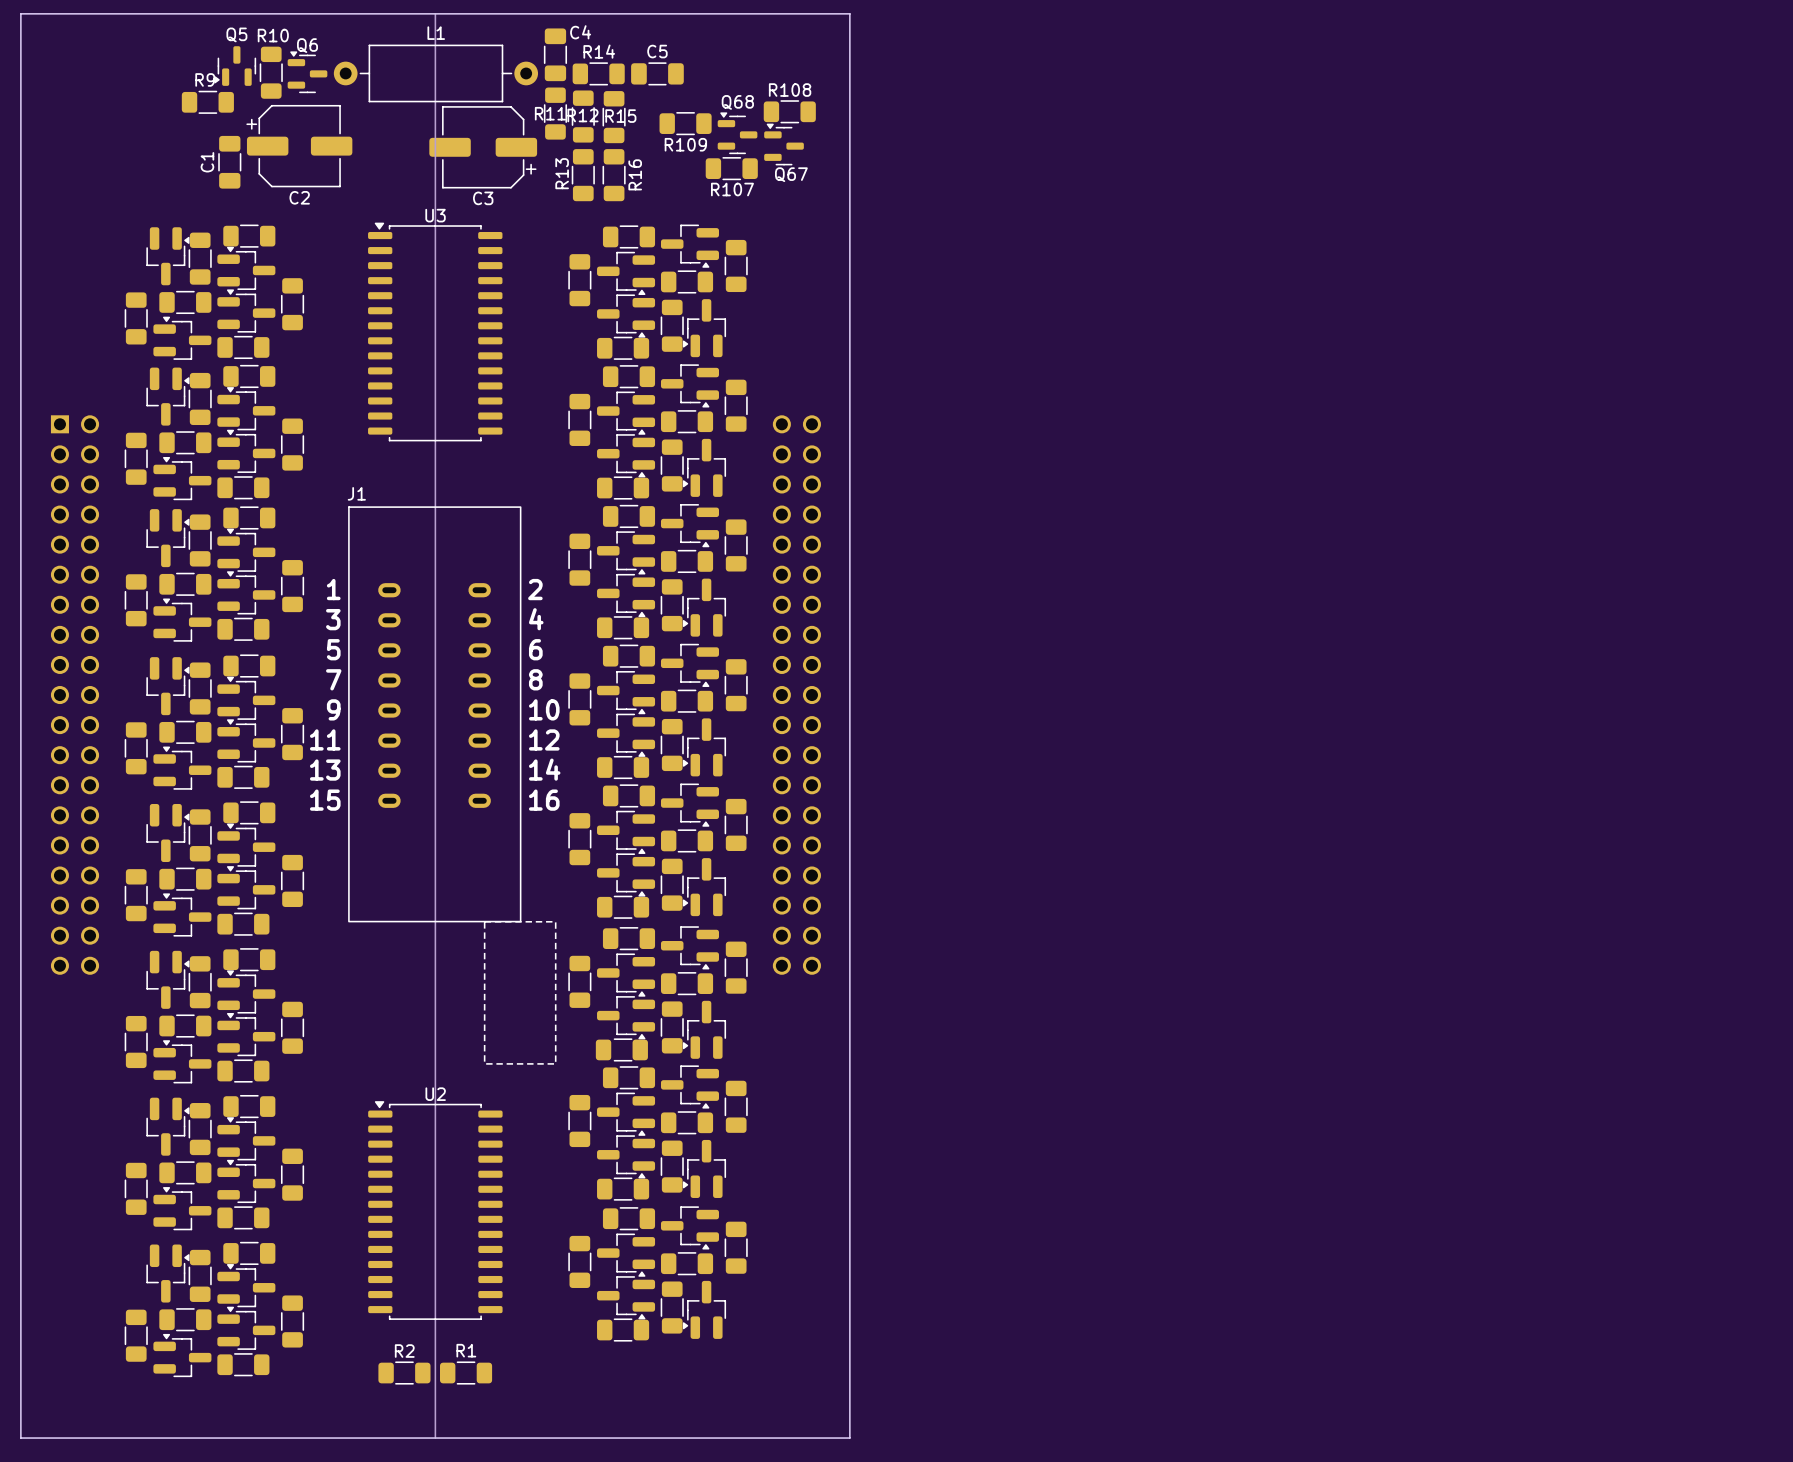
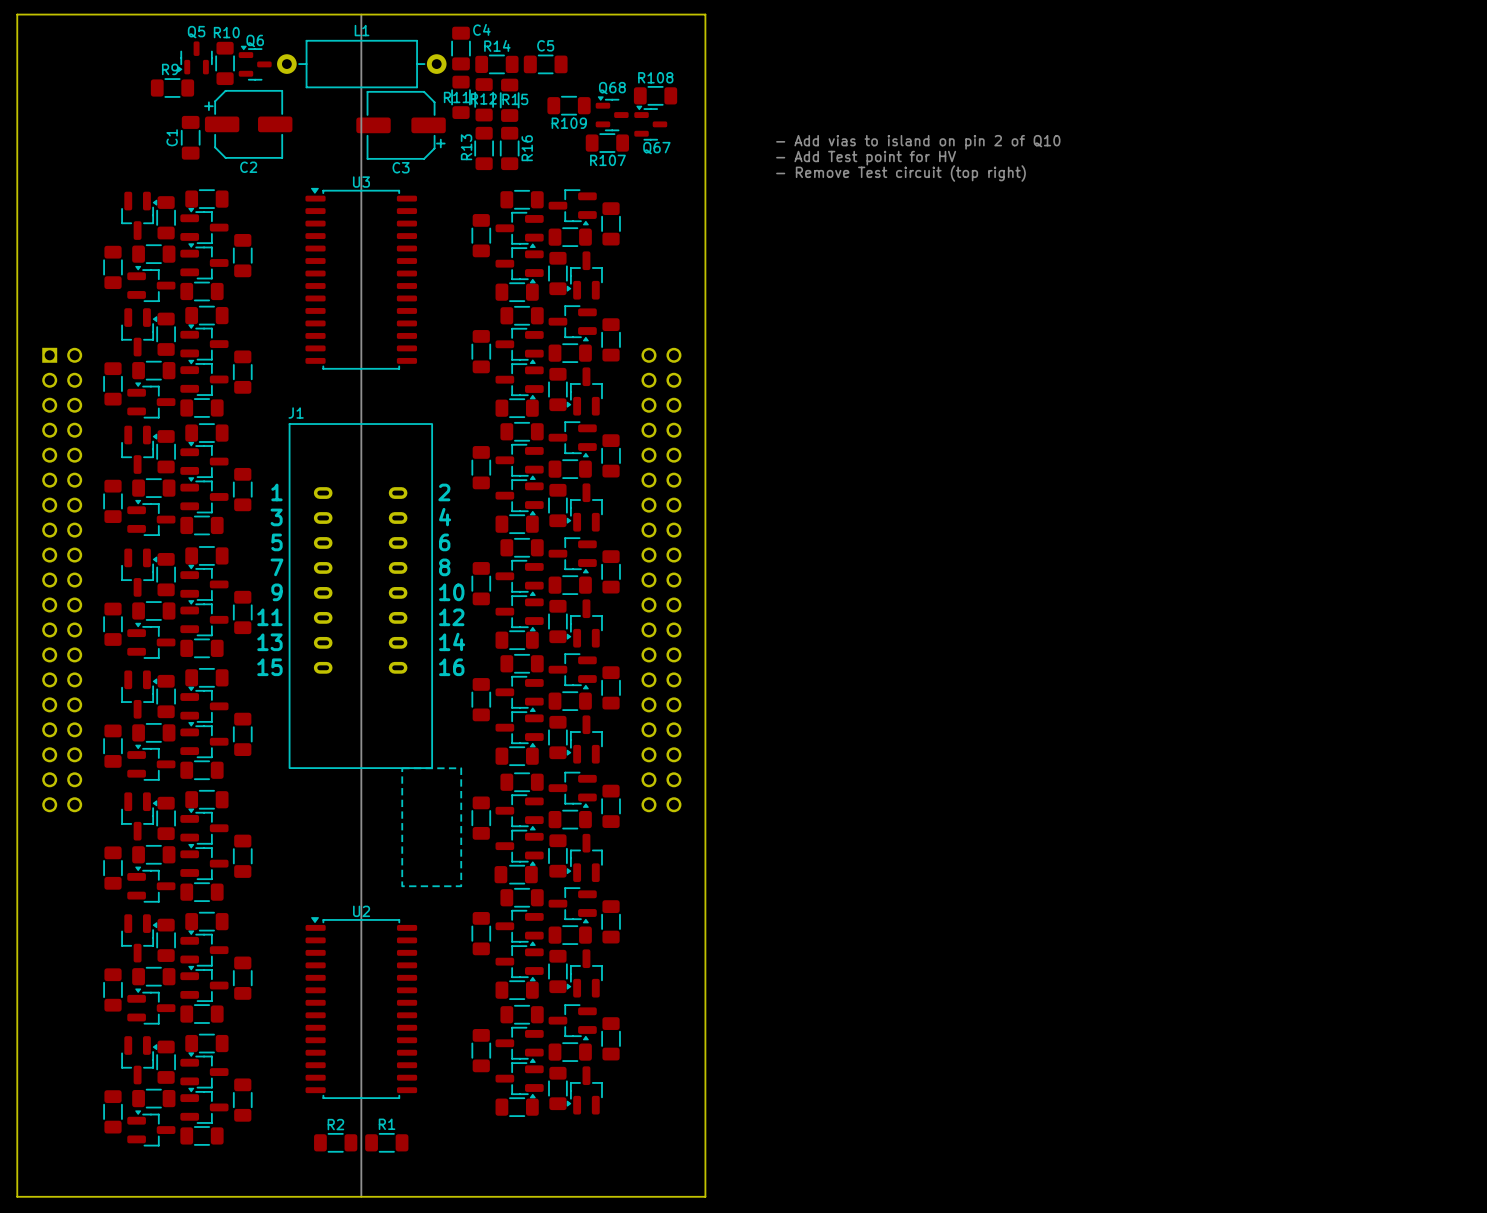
text: none -> - Add vias to island on pin 2 of Q10 (918, 142)
text: none -> - Add Test point for HV (866, 158)
text: none -> - Remove Test circuit (top right) (901, 173)

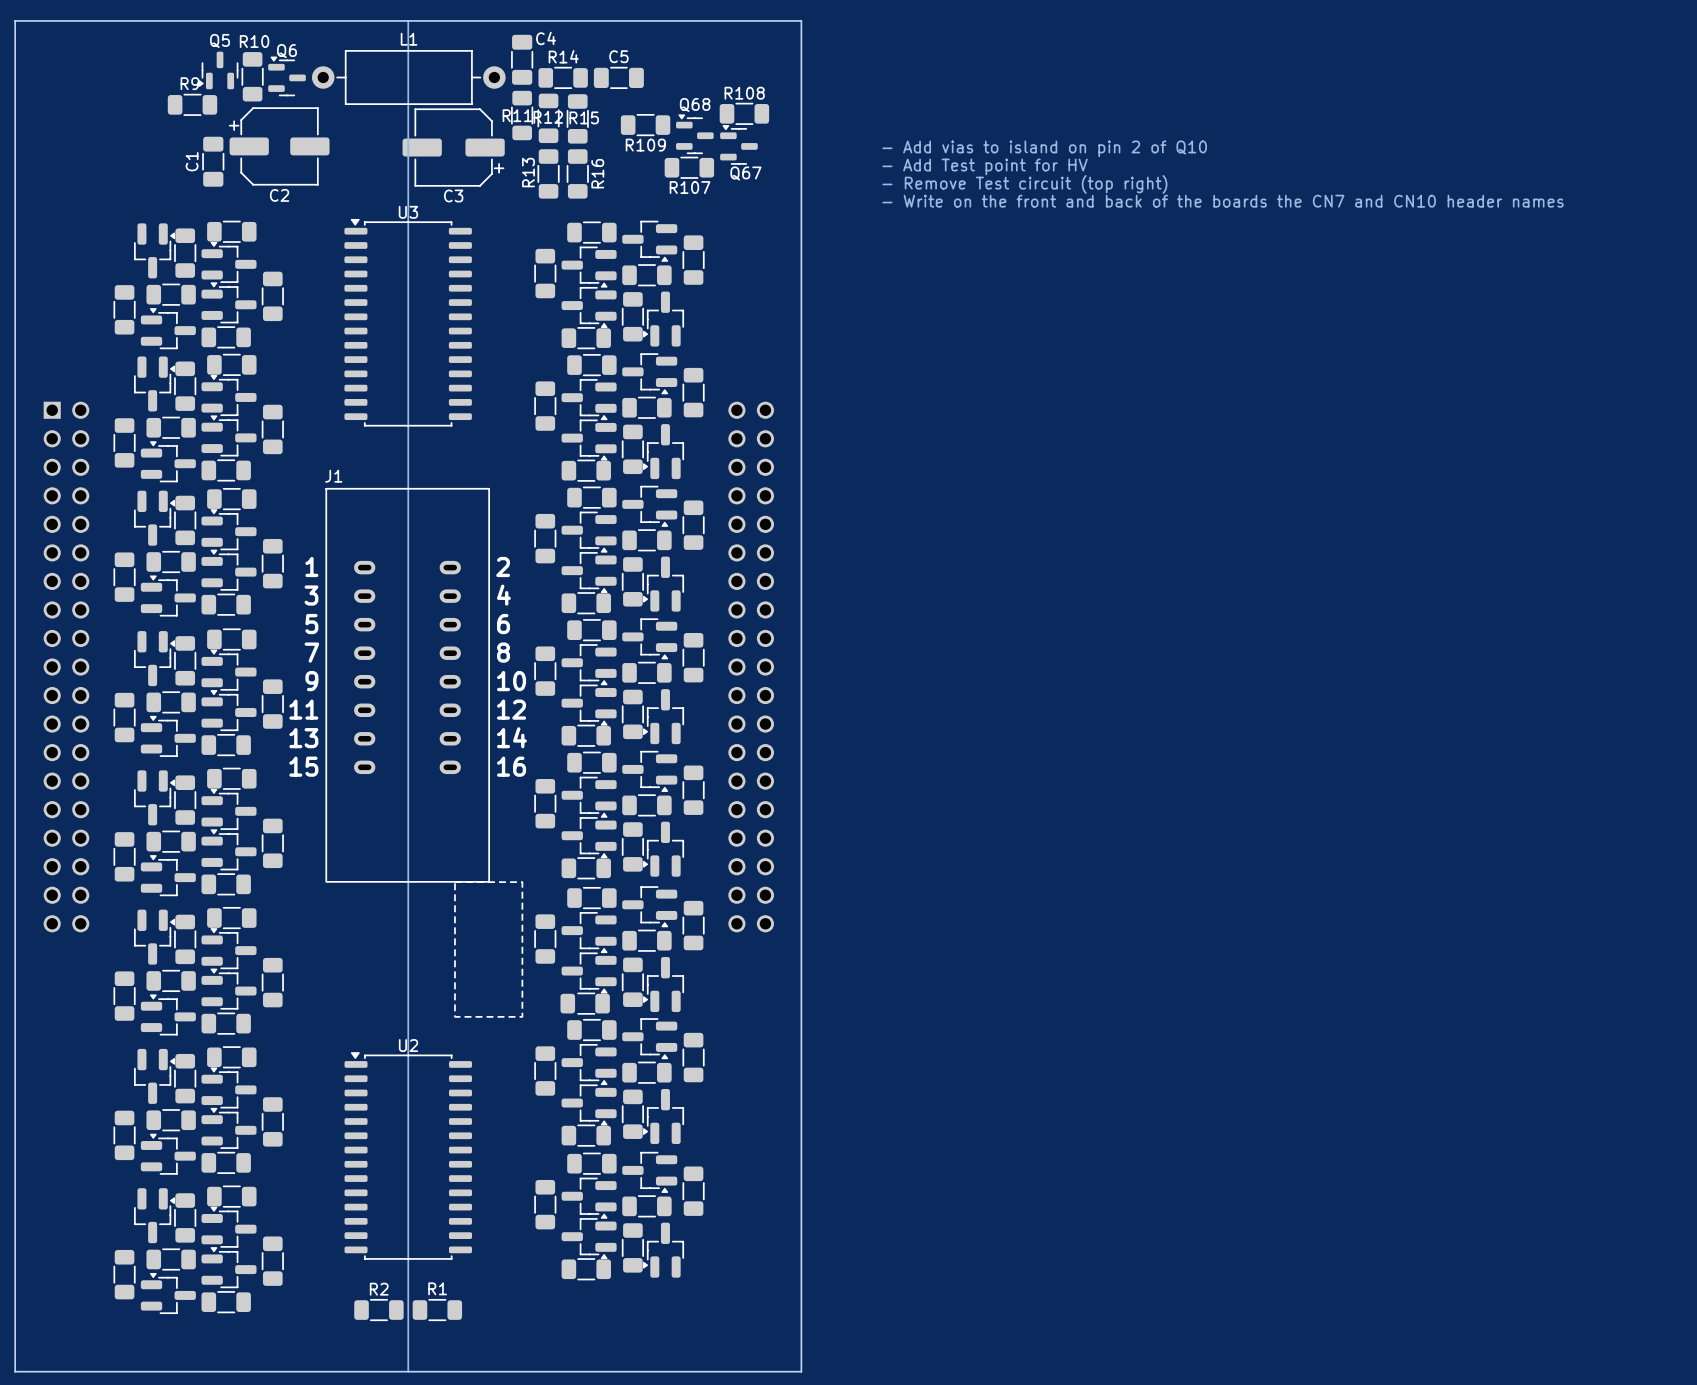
text: none -> - Add vias to island on pin 2 of Q10 (1044, 148)
text: - Add vias to island on pin 2 of Q10 (918, 142) -> - Add Test point for HV (985, 166)
text: - Add Test point for HV (866, 158) -> - Remove Test circuit (top right) (1024, 184)
text: - Remove Test circuit (top right) (901, 173) -> - Write on the front and back of the boards the CN7 and CN10 header names (1223, 201)

